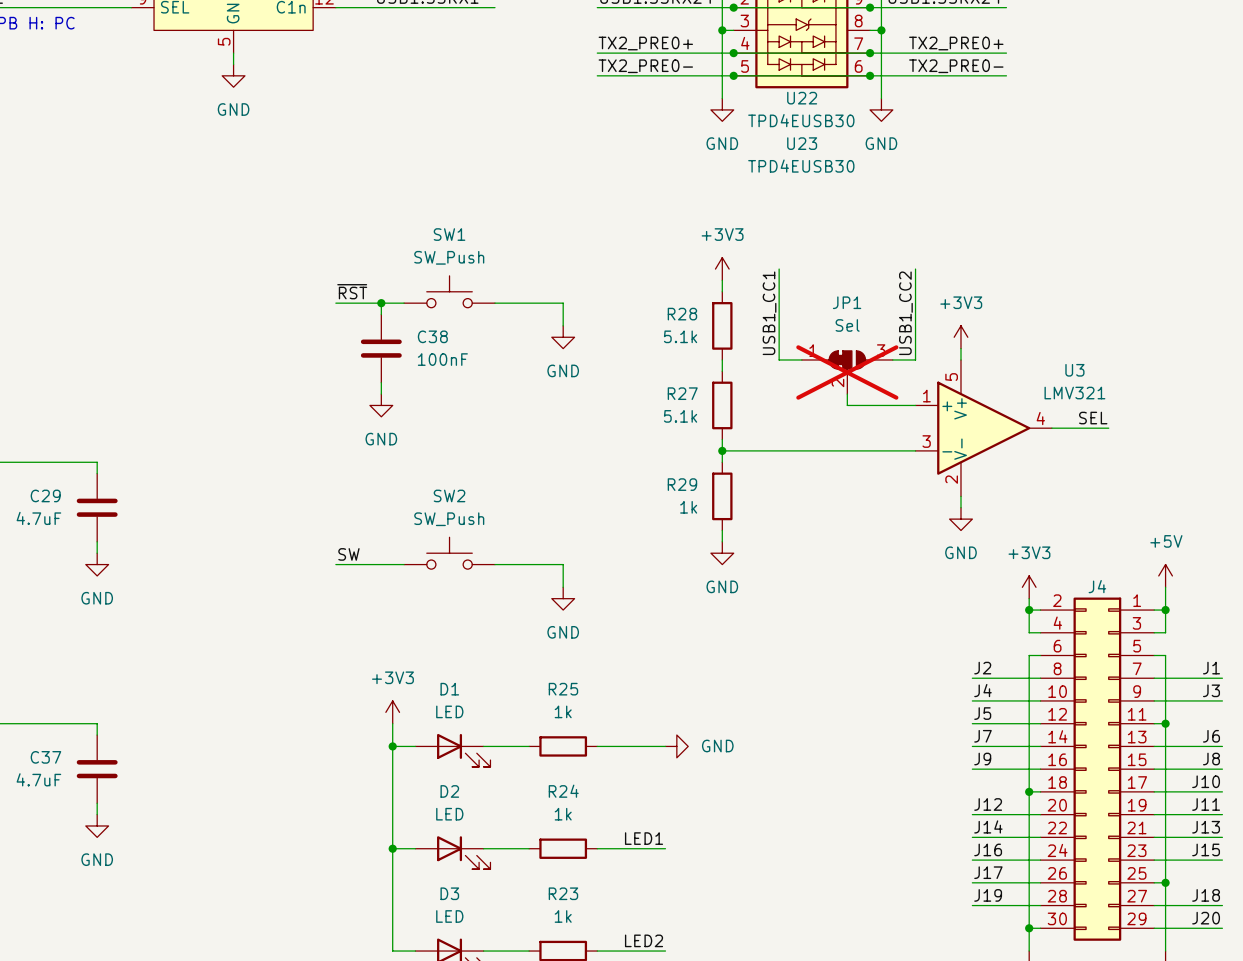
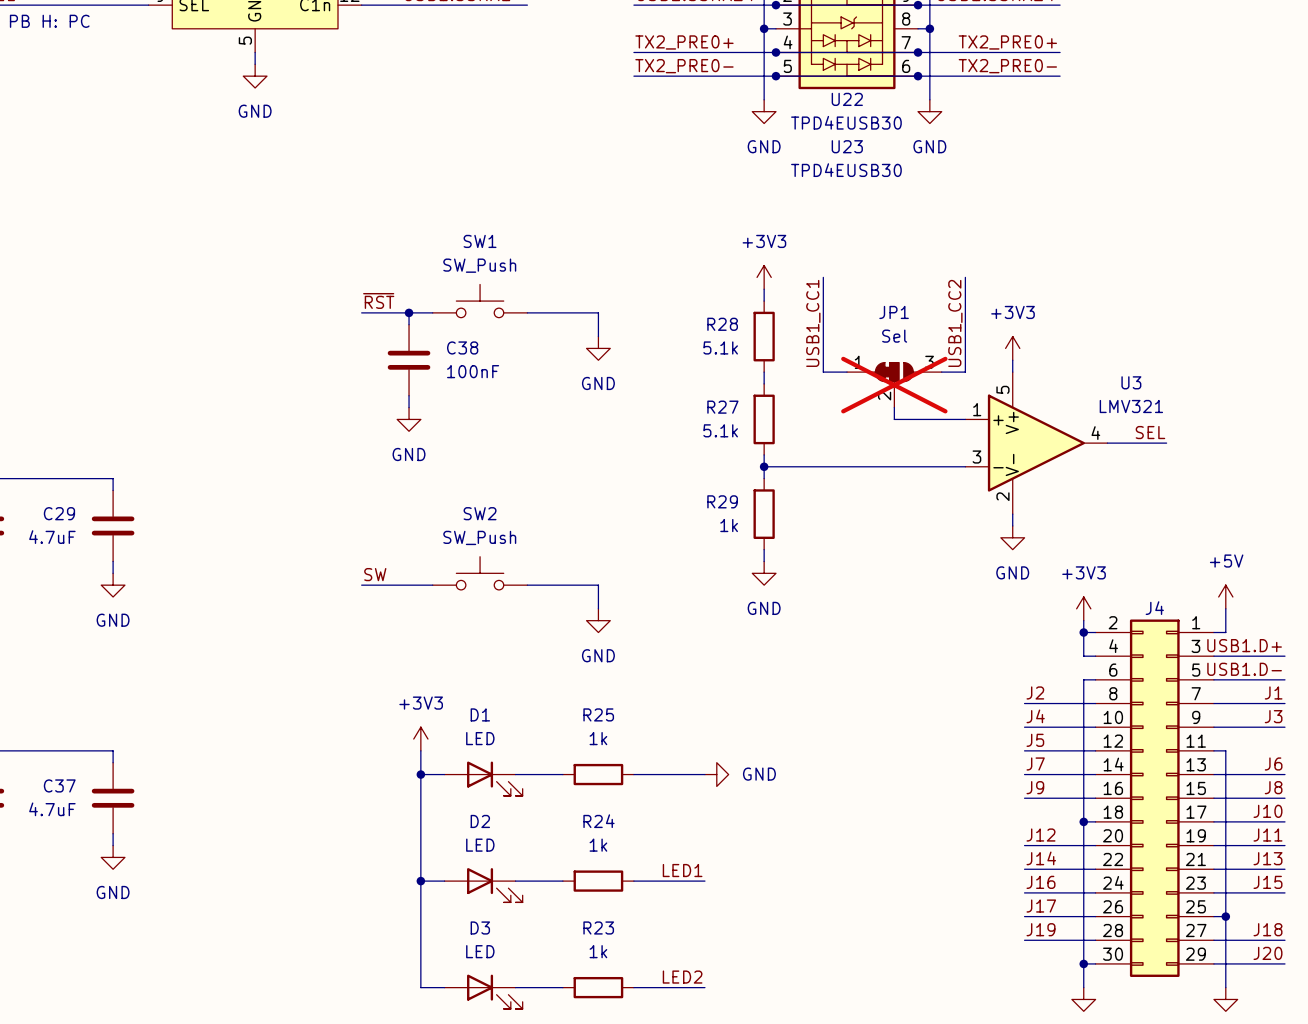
wire: (1165, 610) (1165, 632) -> (1284, 656) (1225, 656)
junction: (1165, 610) -> none
label: none -> USB1.D+ (1244, 645)
label: none -> USB1.D- (1244, 669)
wire: (1165, 655) (1165, 723) -> (1225, 679) (1284, 679)
junction: (1165, 723) -> none

